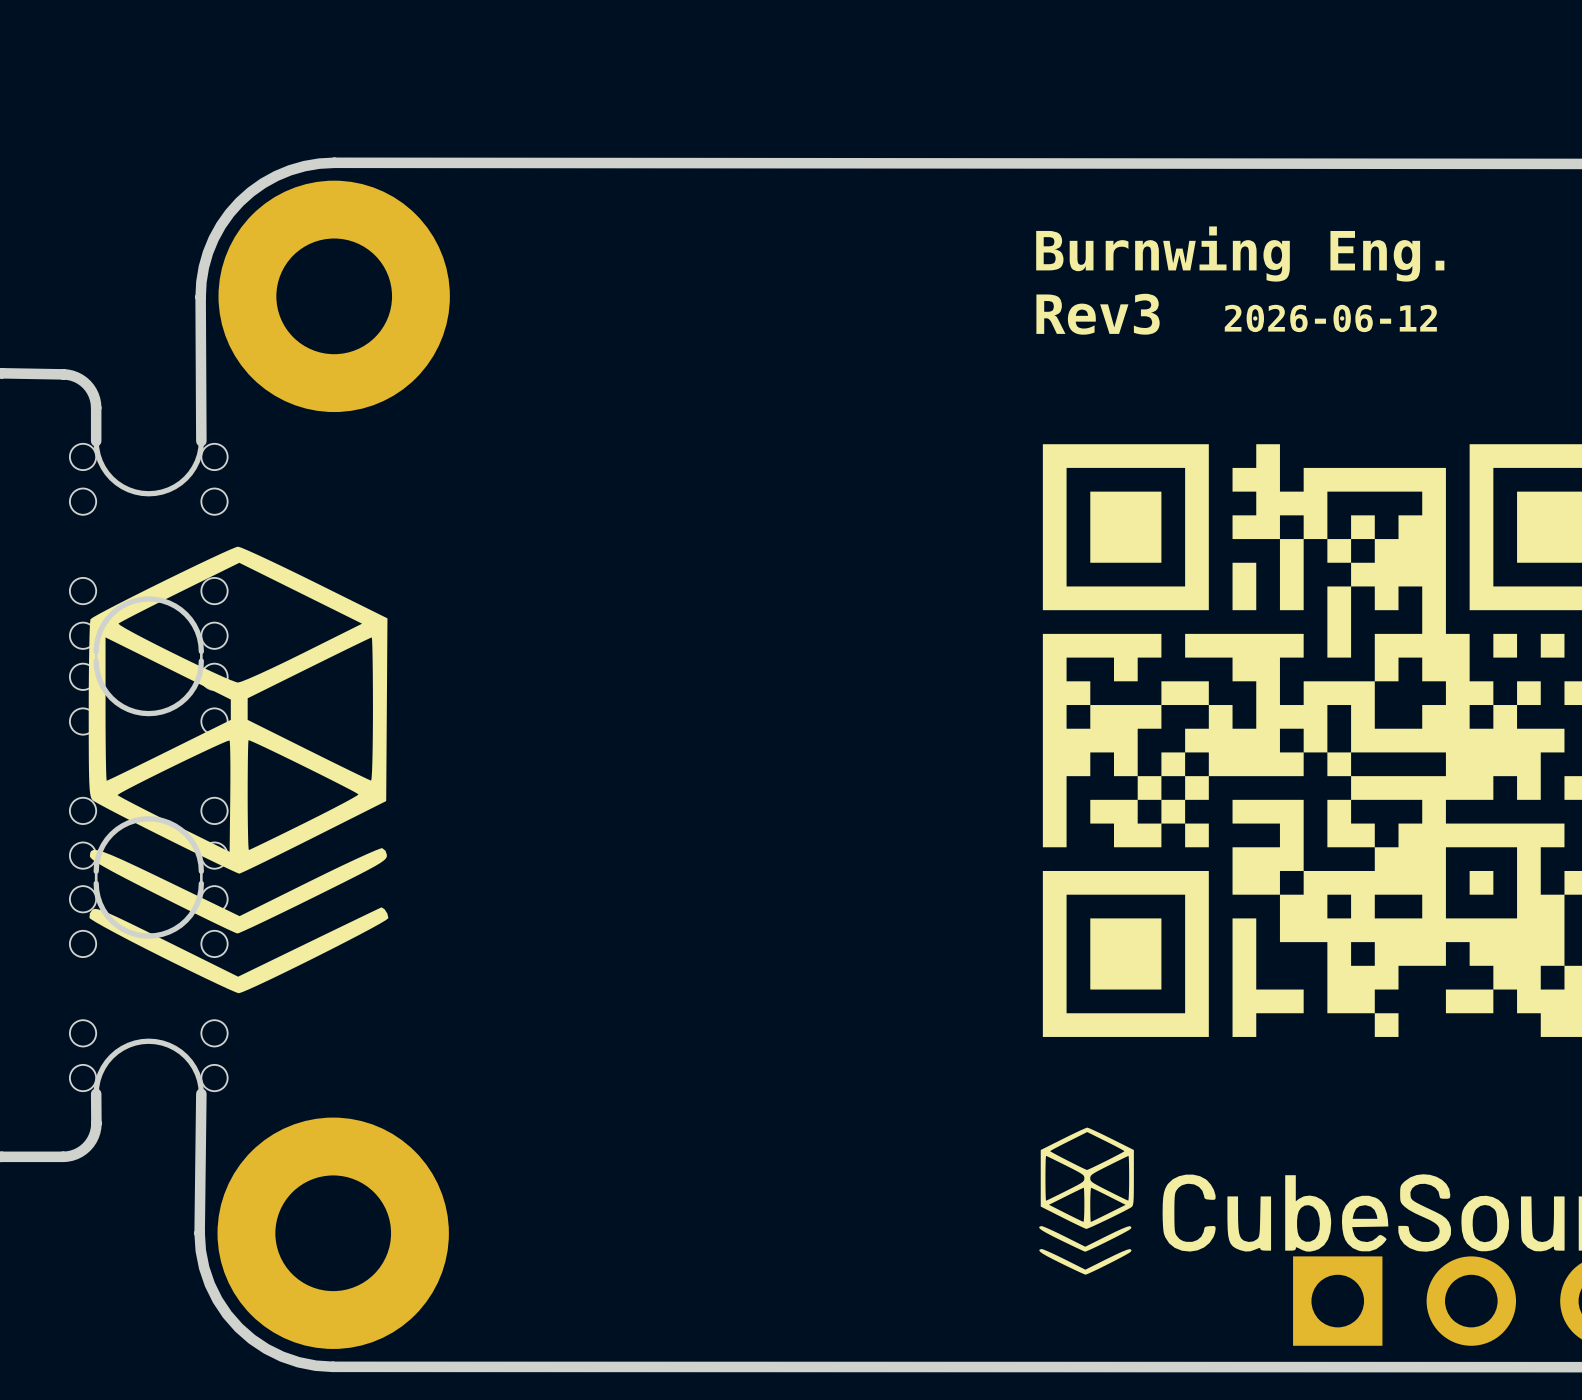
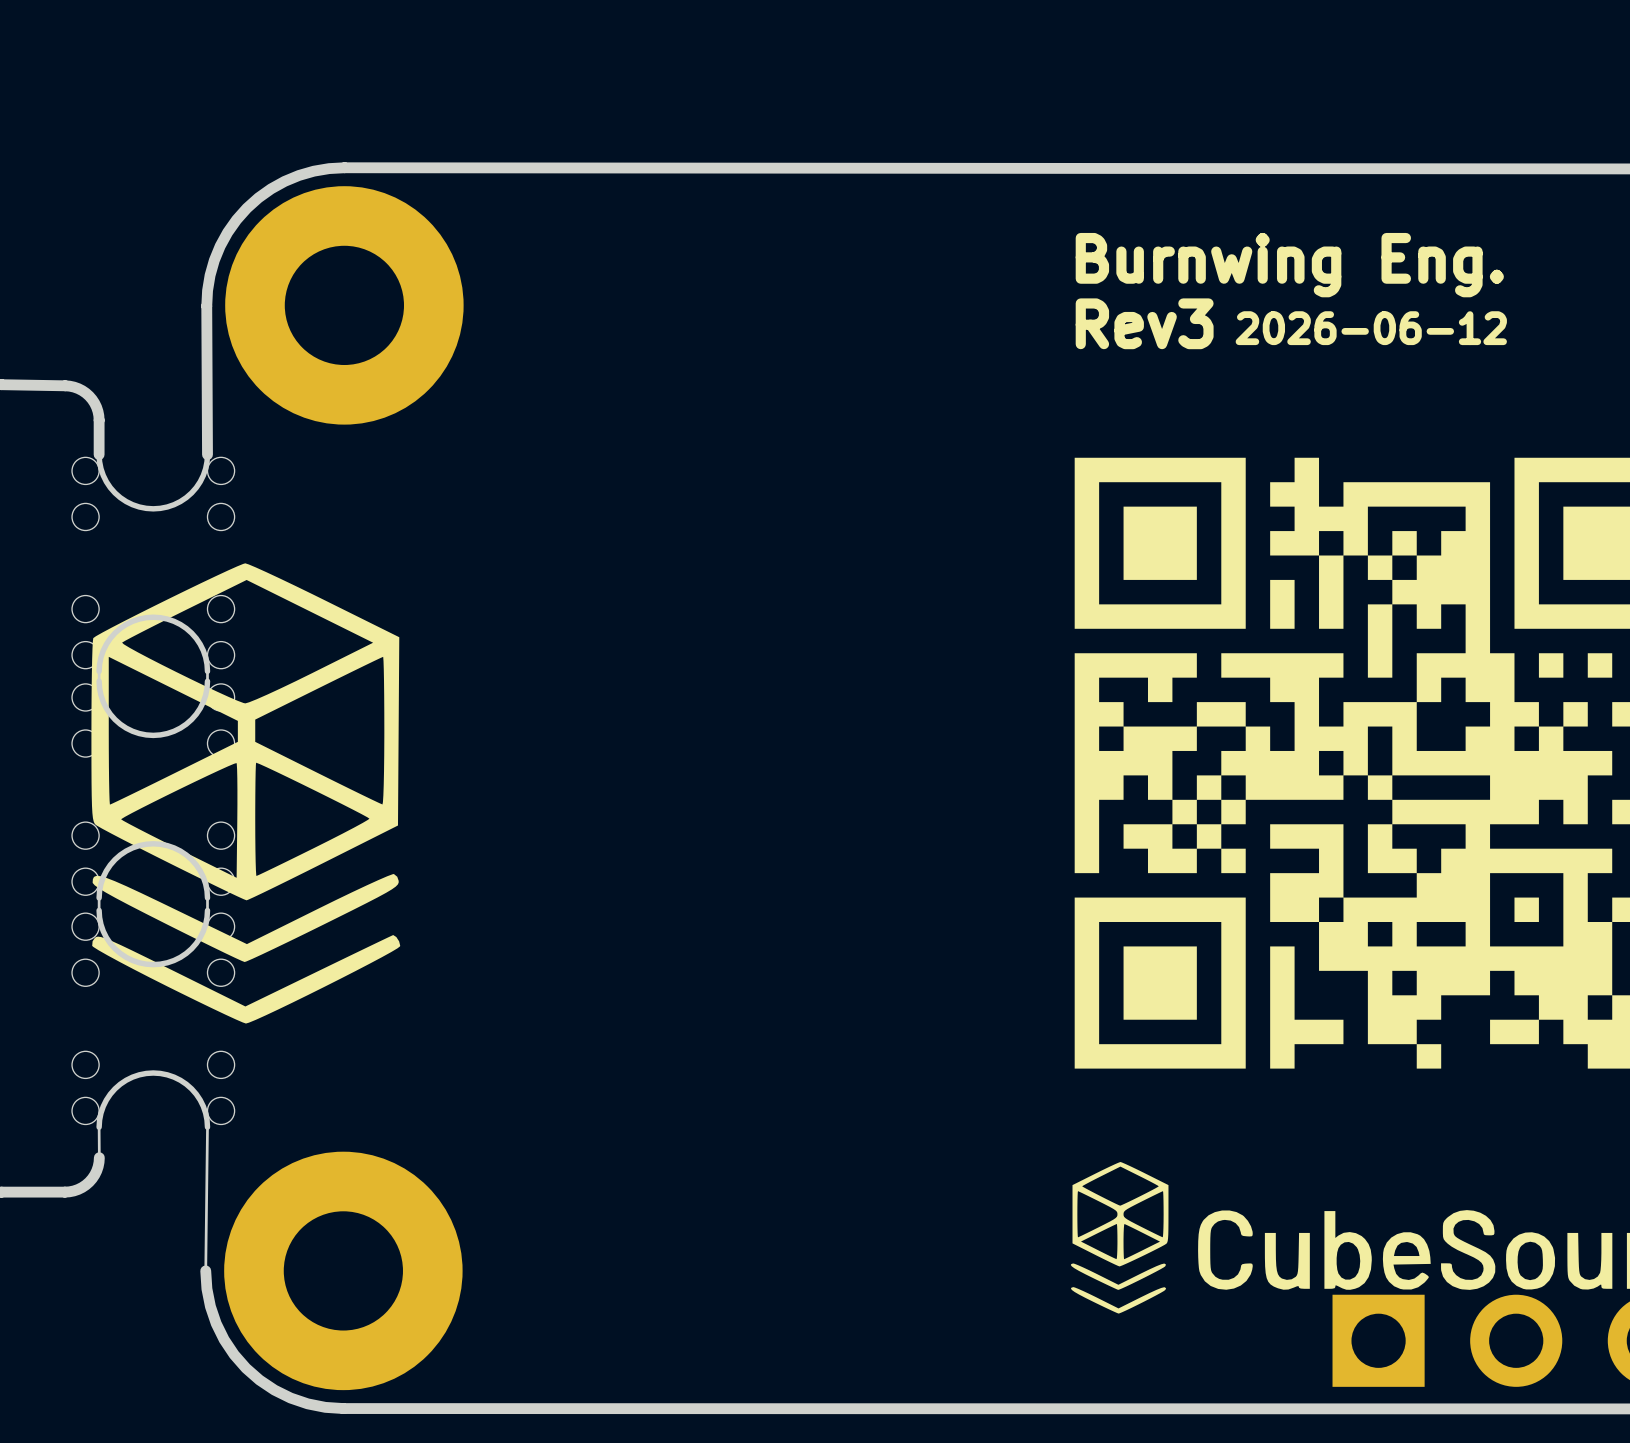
board edge width: thick (96, 1093) (96, 1123) -> thin (99, 1127) (99, 1157)
board edge width: thick (201, 1093) (199, 1233) -> thin (207, 1127) (205, 1270)

